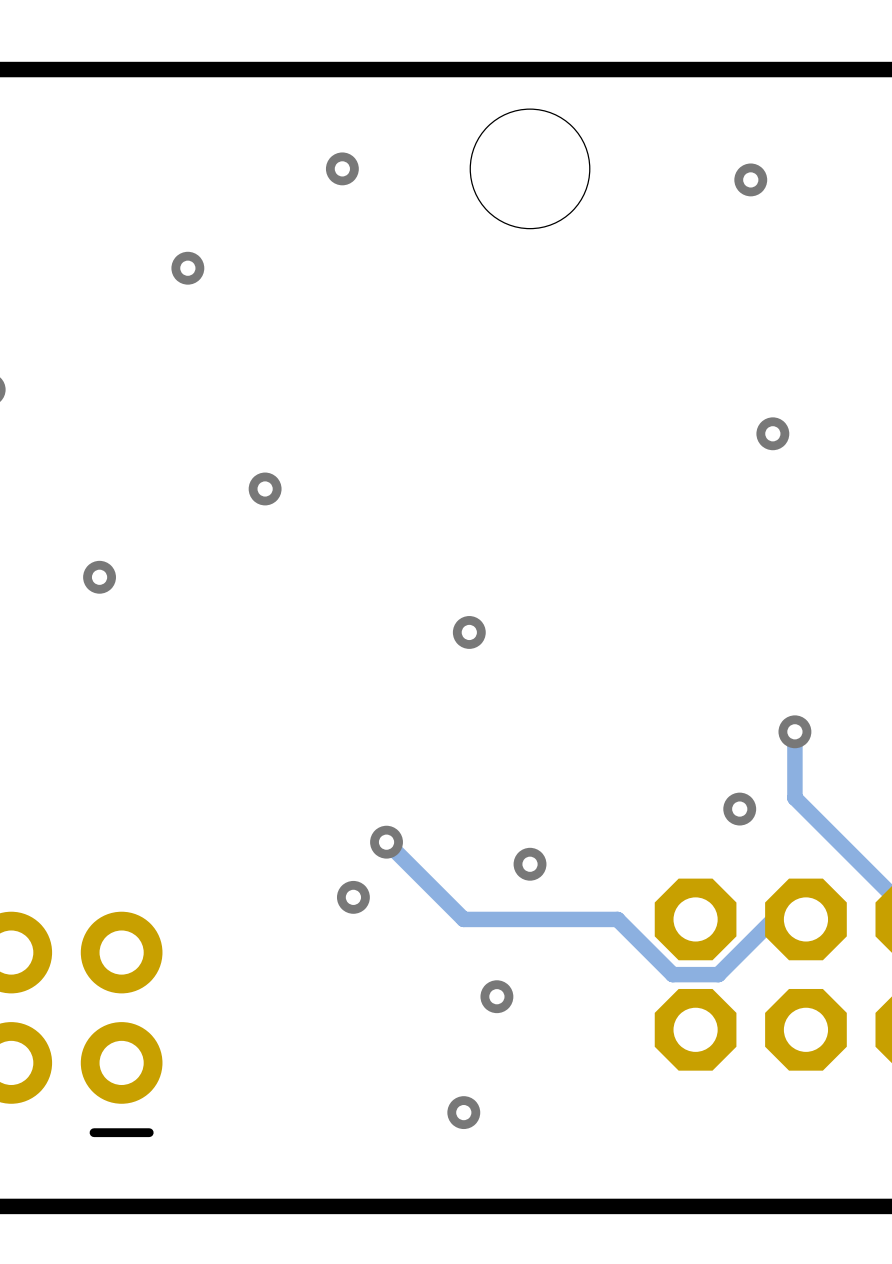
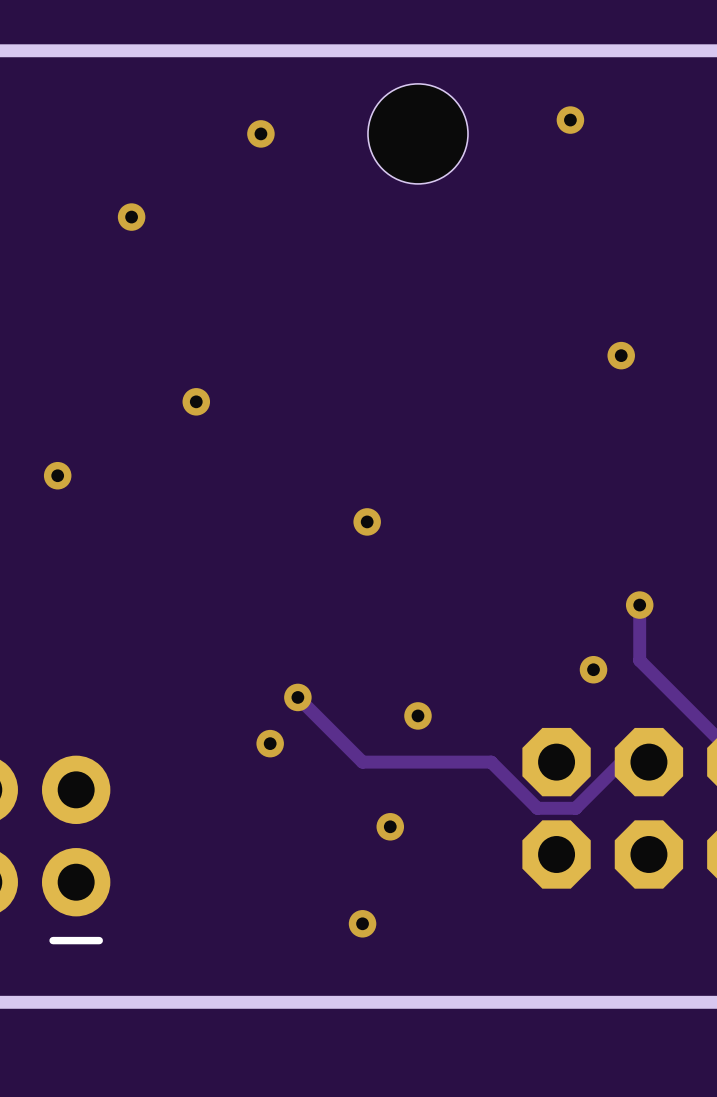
via position: (750, 179) -> (570, 120)

